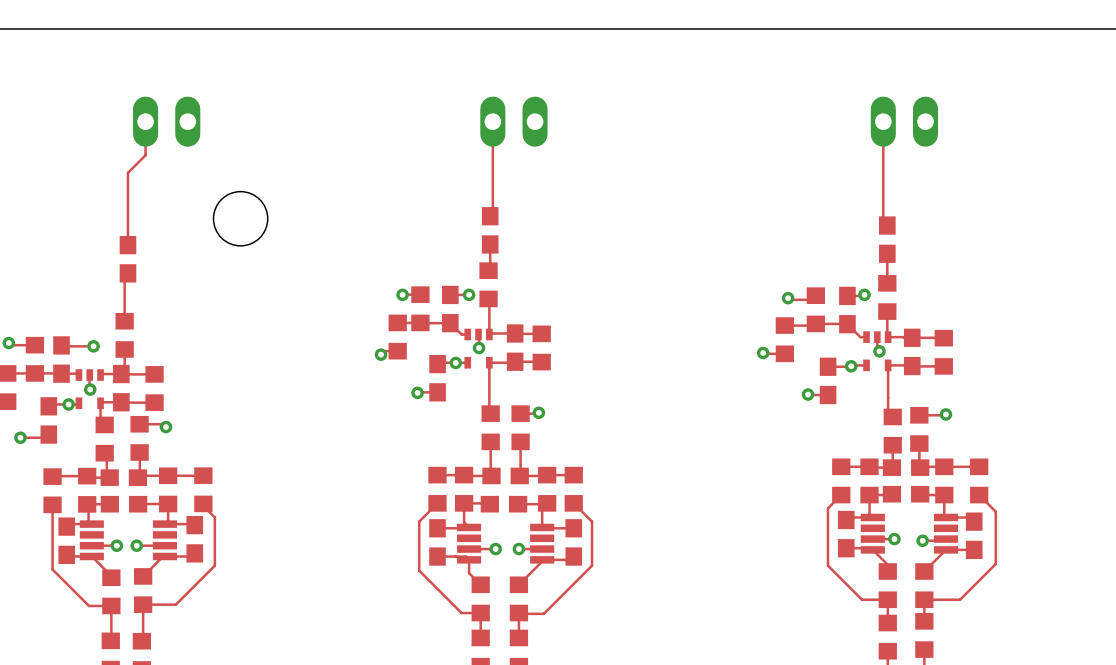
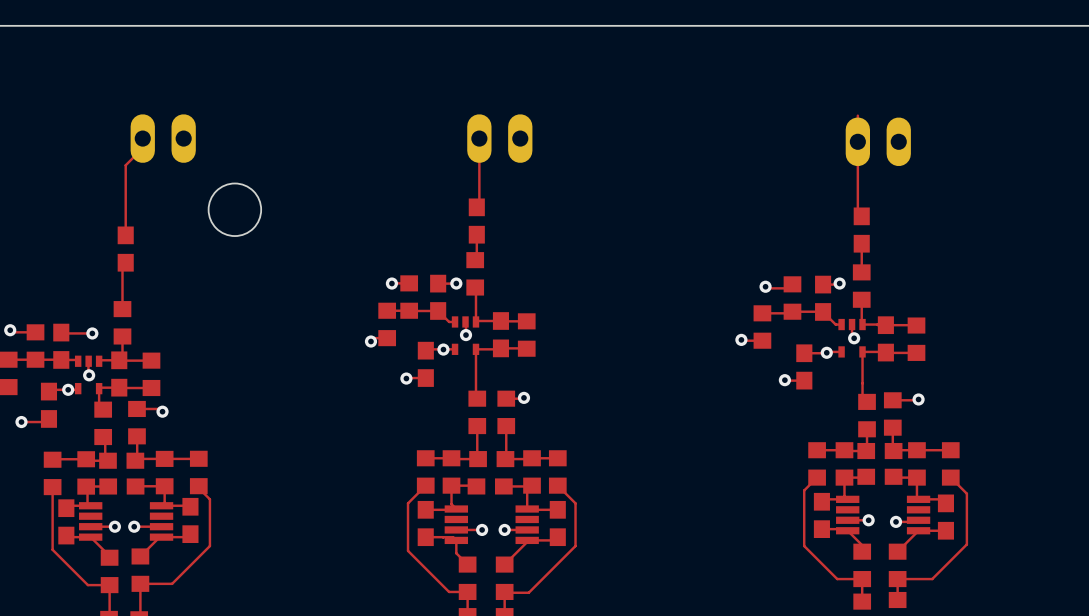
part position: (166, 121) -> (163, 138)
part position: (513, 121) -> (499, 138)
part position: (904, 121) -> (878, 141)

